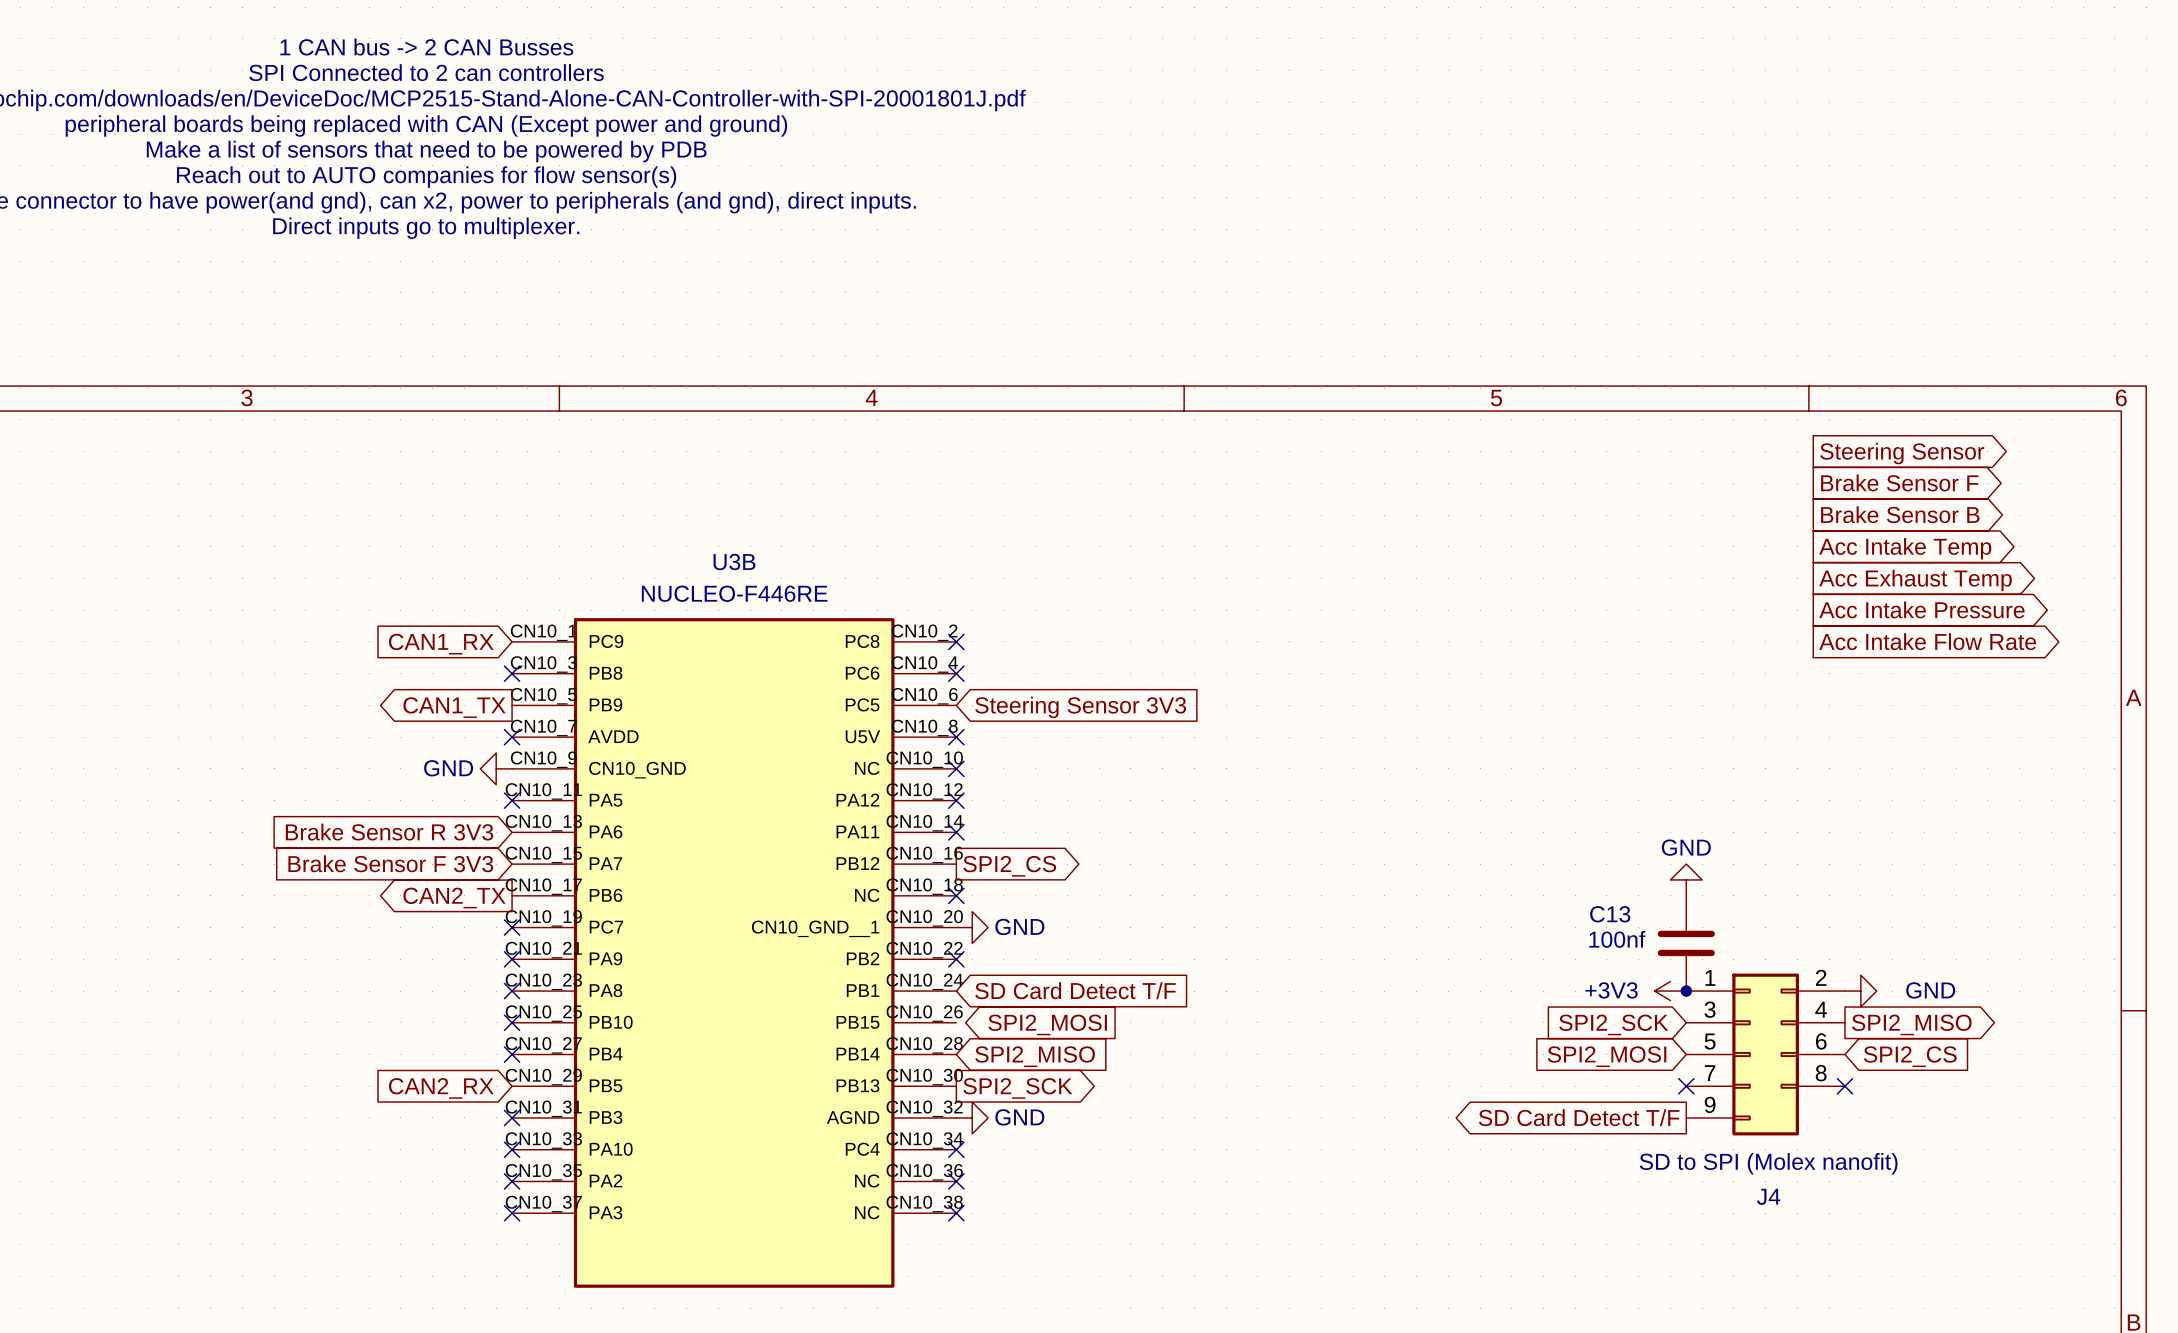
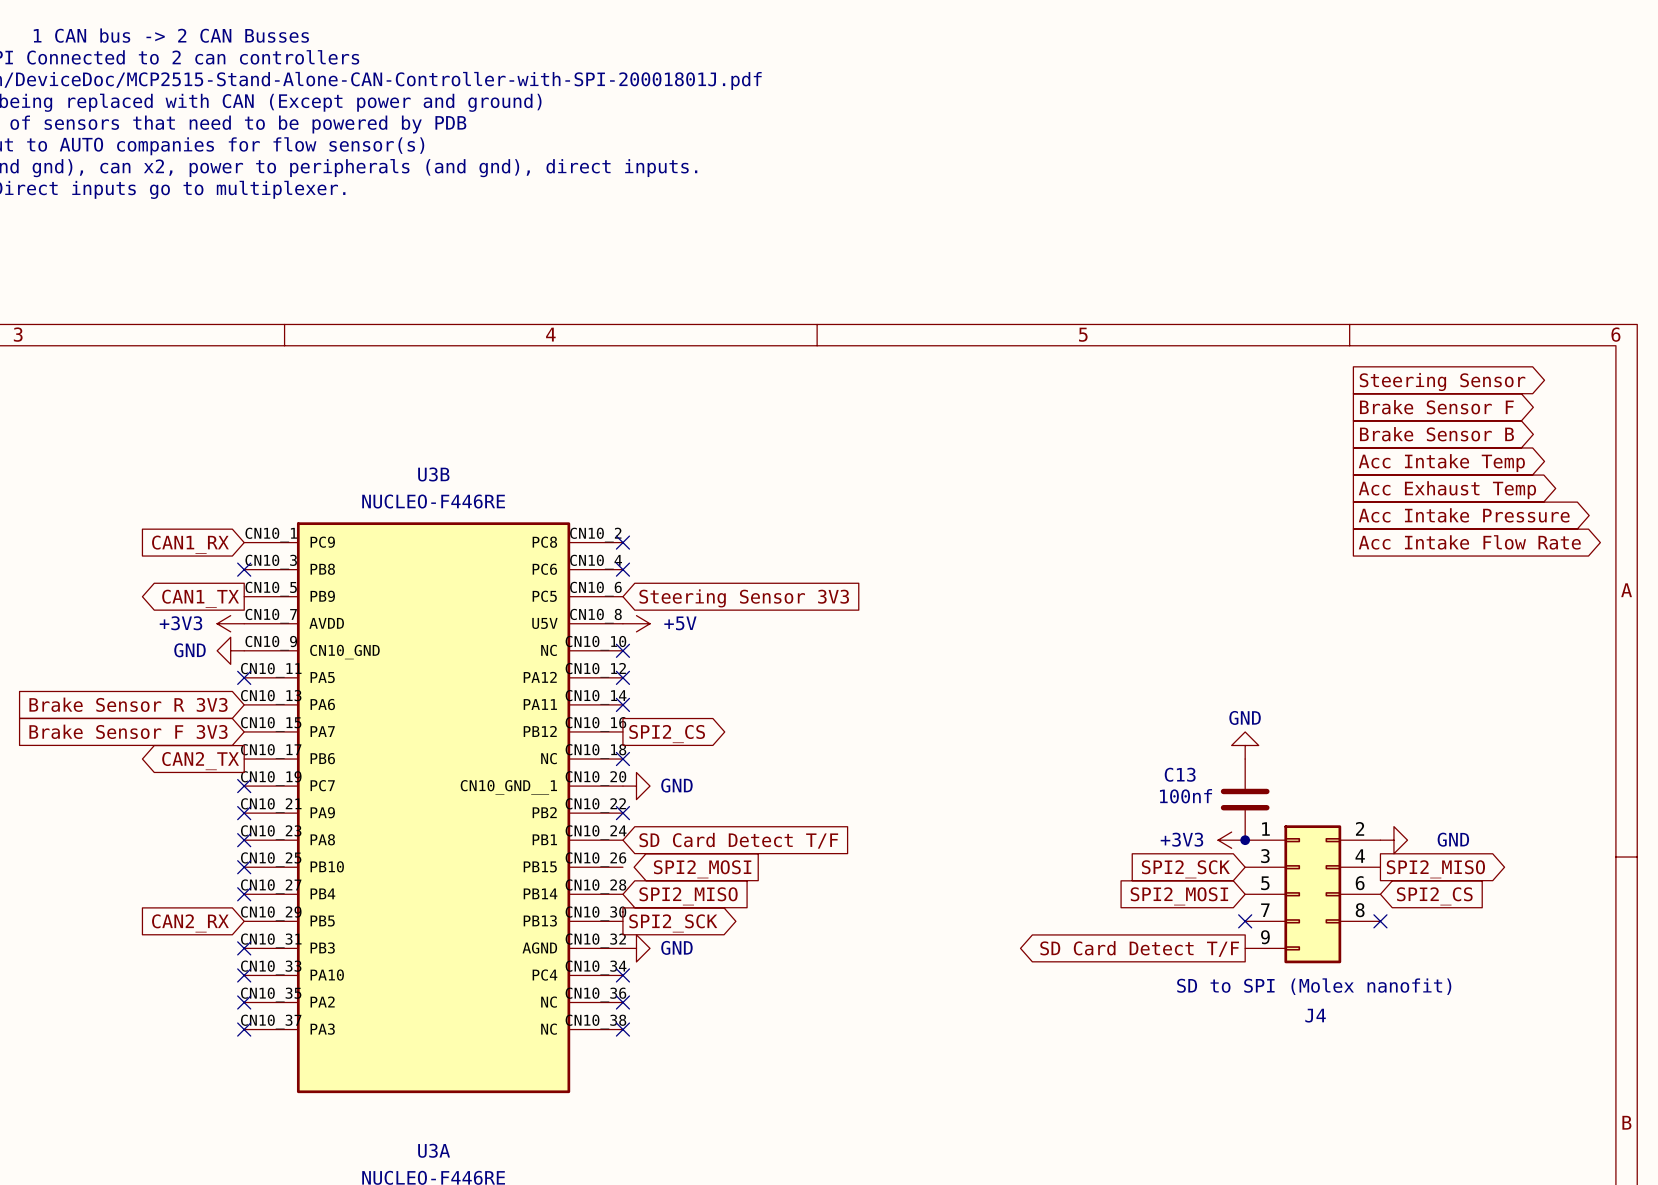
power symbol: none -> +3V3 (230, 623)
no-connect mark: (512, 737) -> none
no-connect mark: (956, 737) -> none
power symbol: none -> +5V (636, 623)

